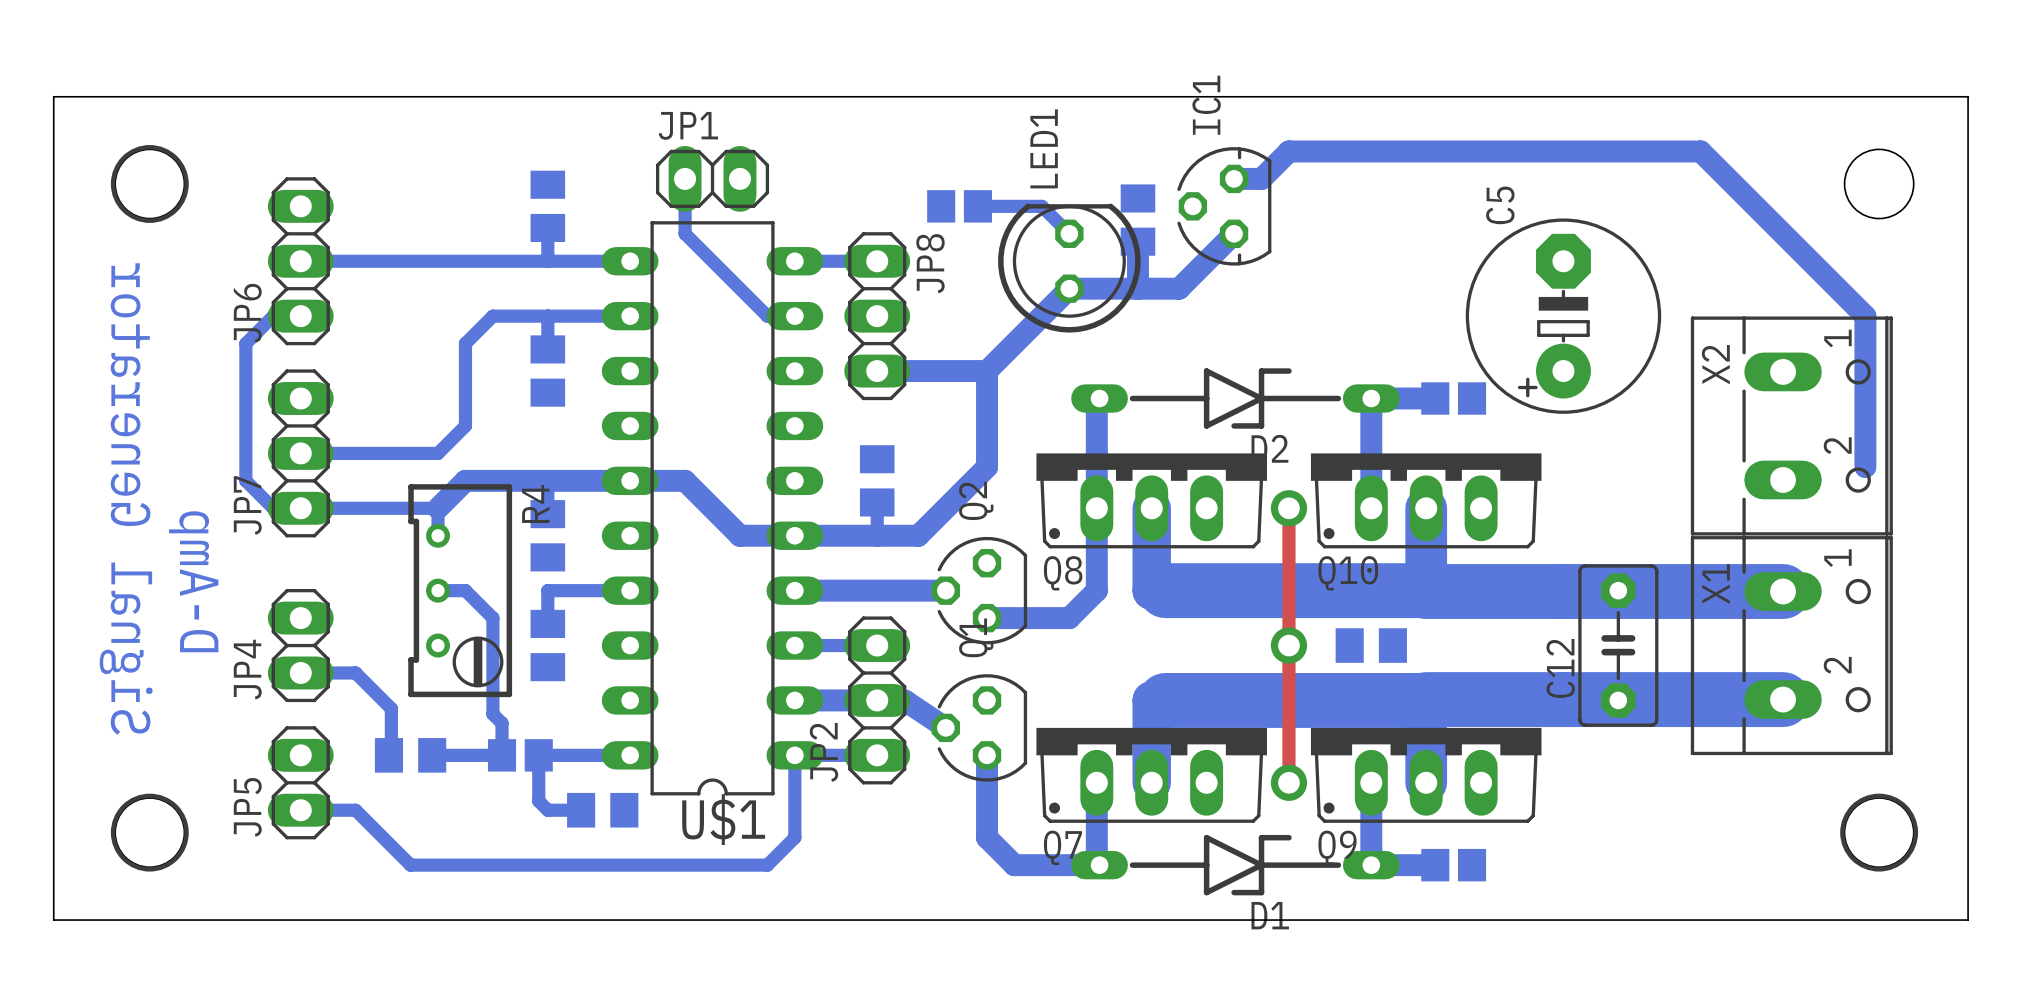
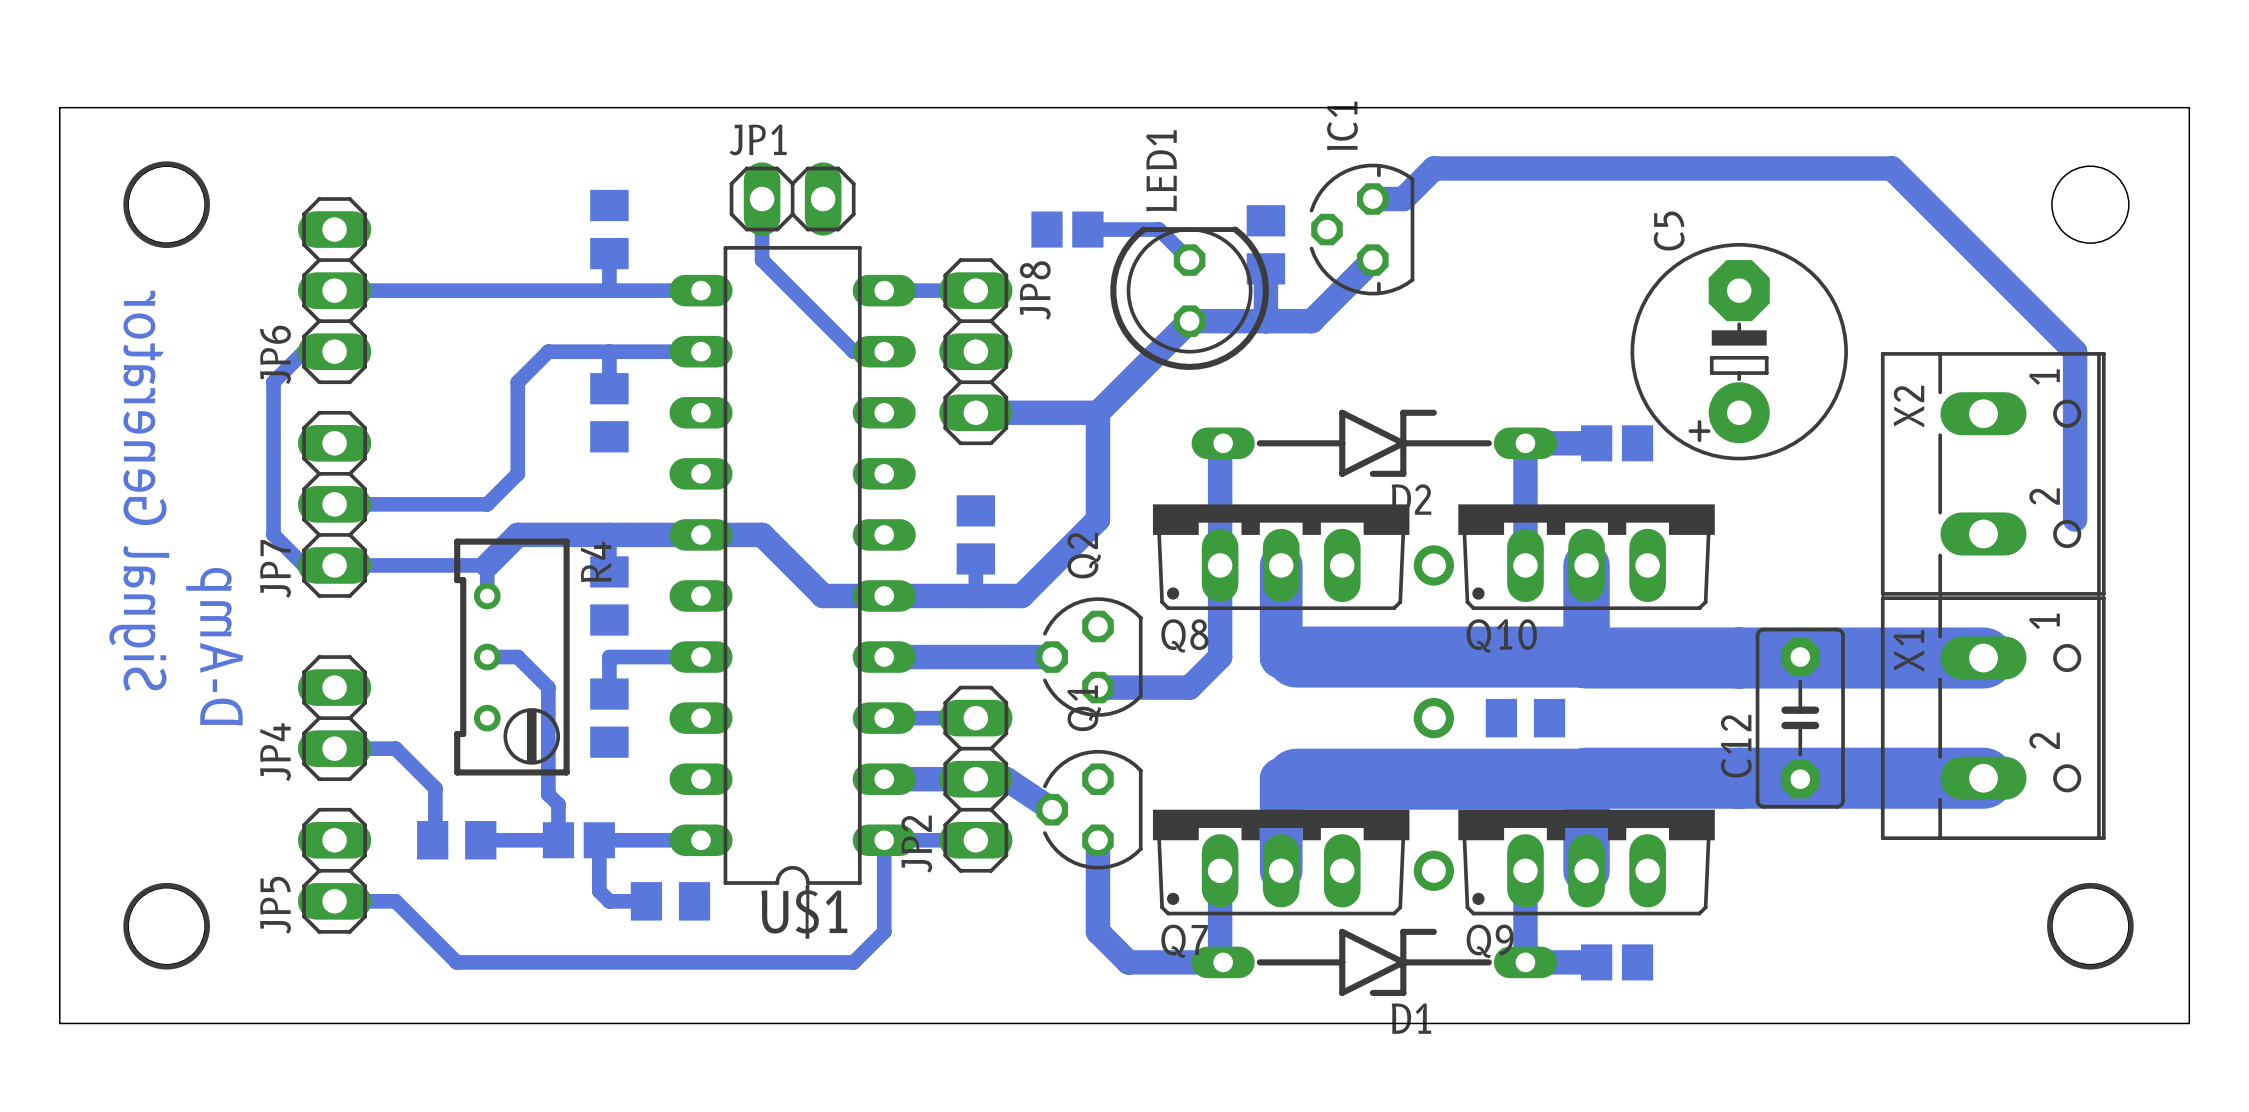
top track: (1288, 508) (1288, 782) -> none

